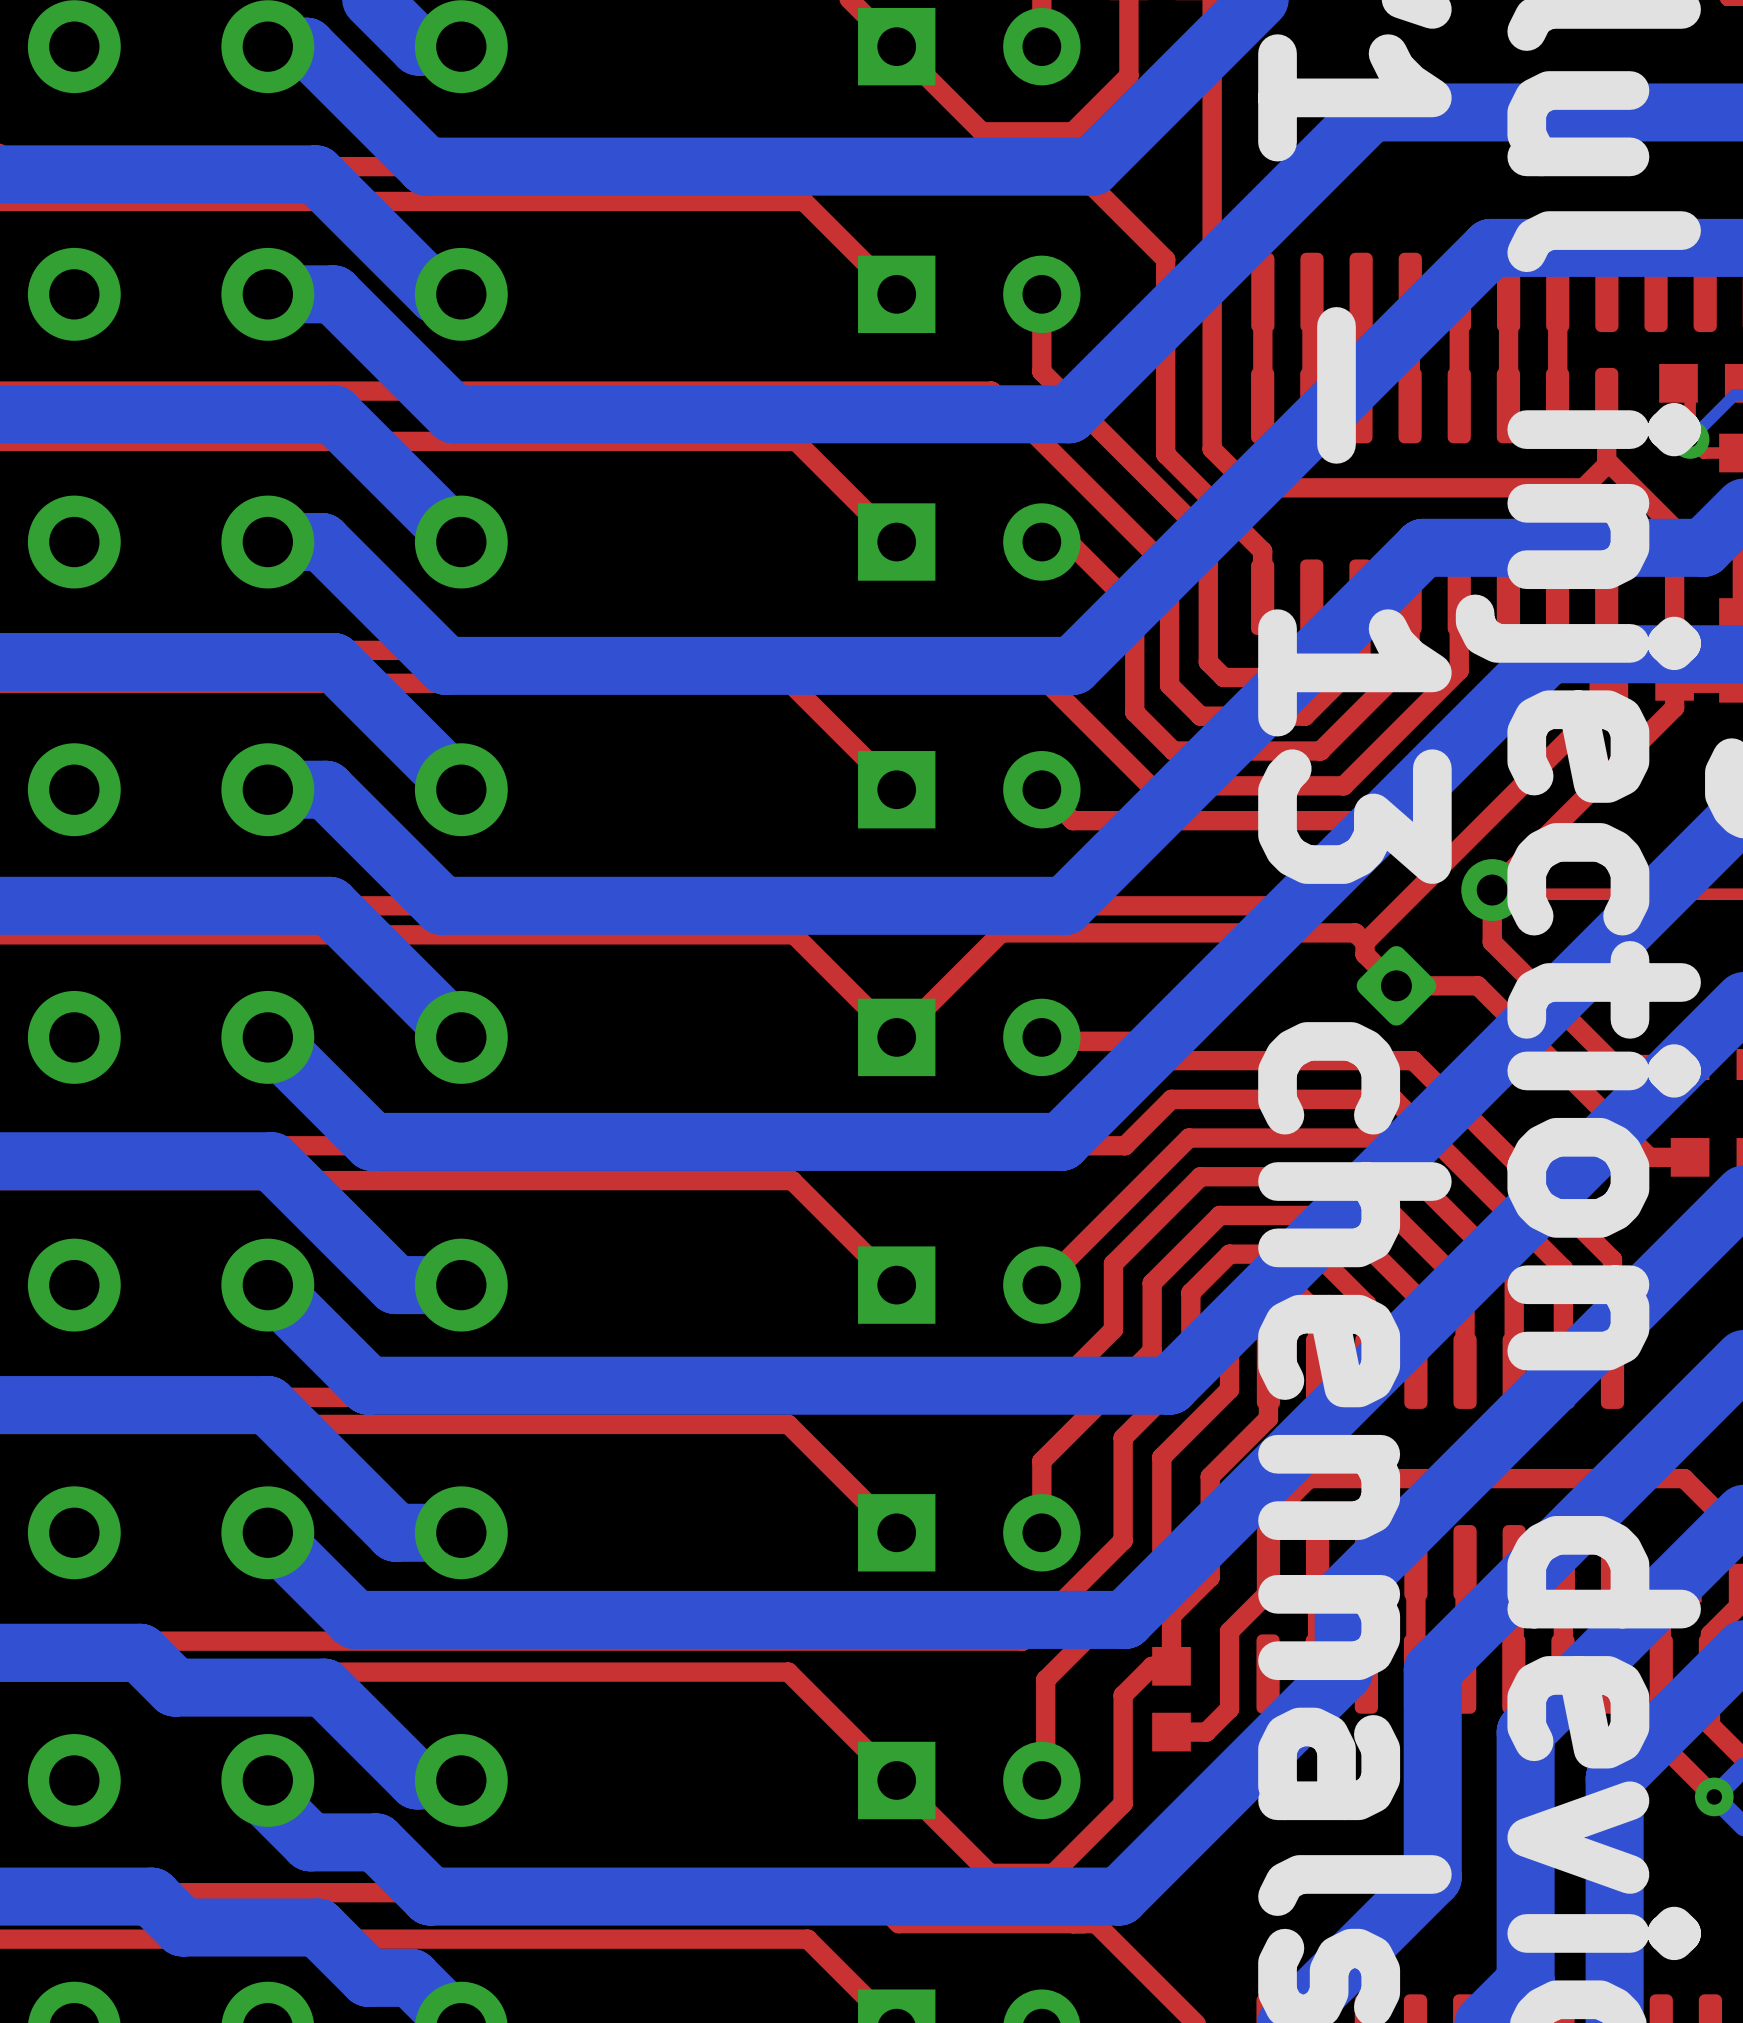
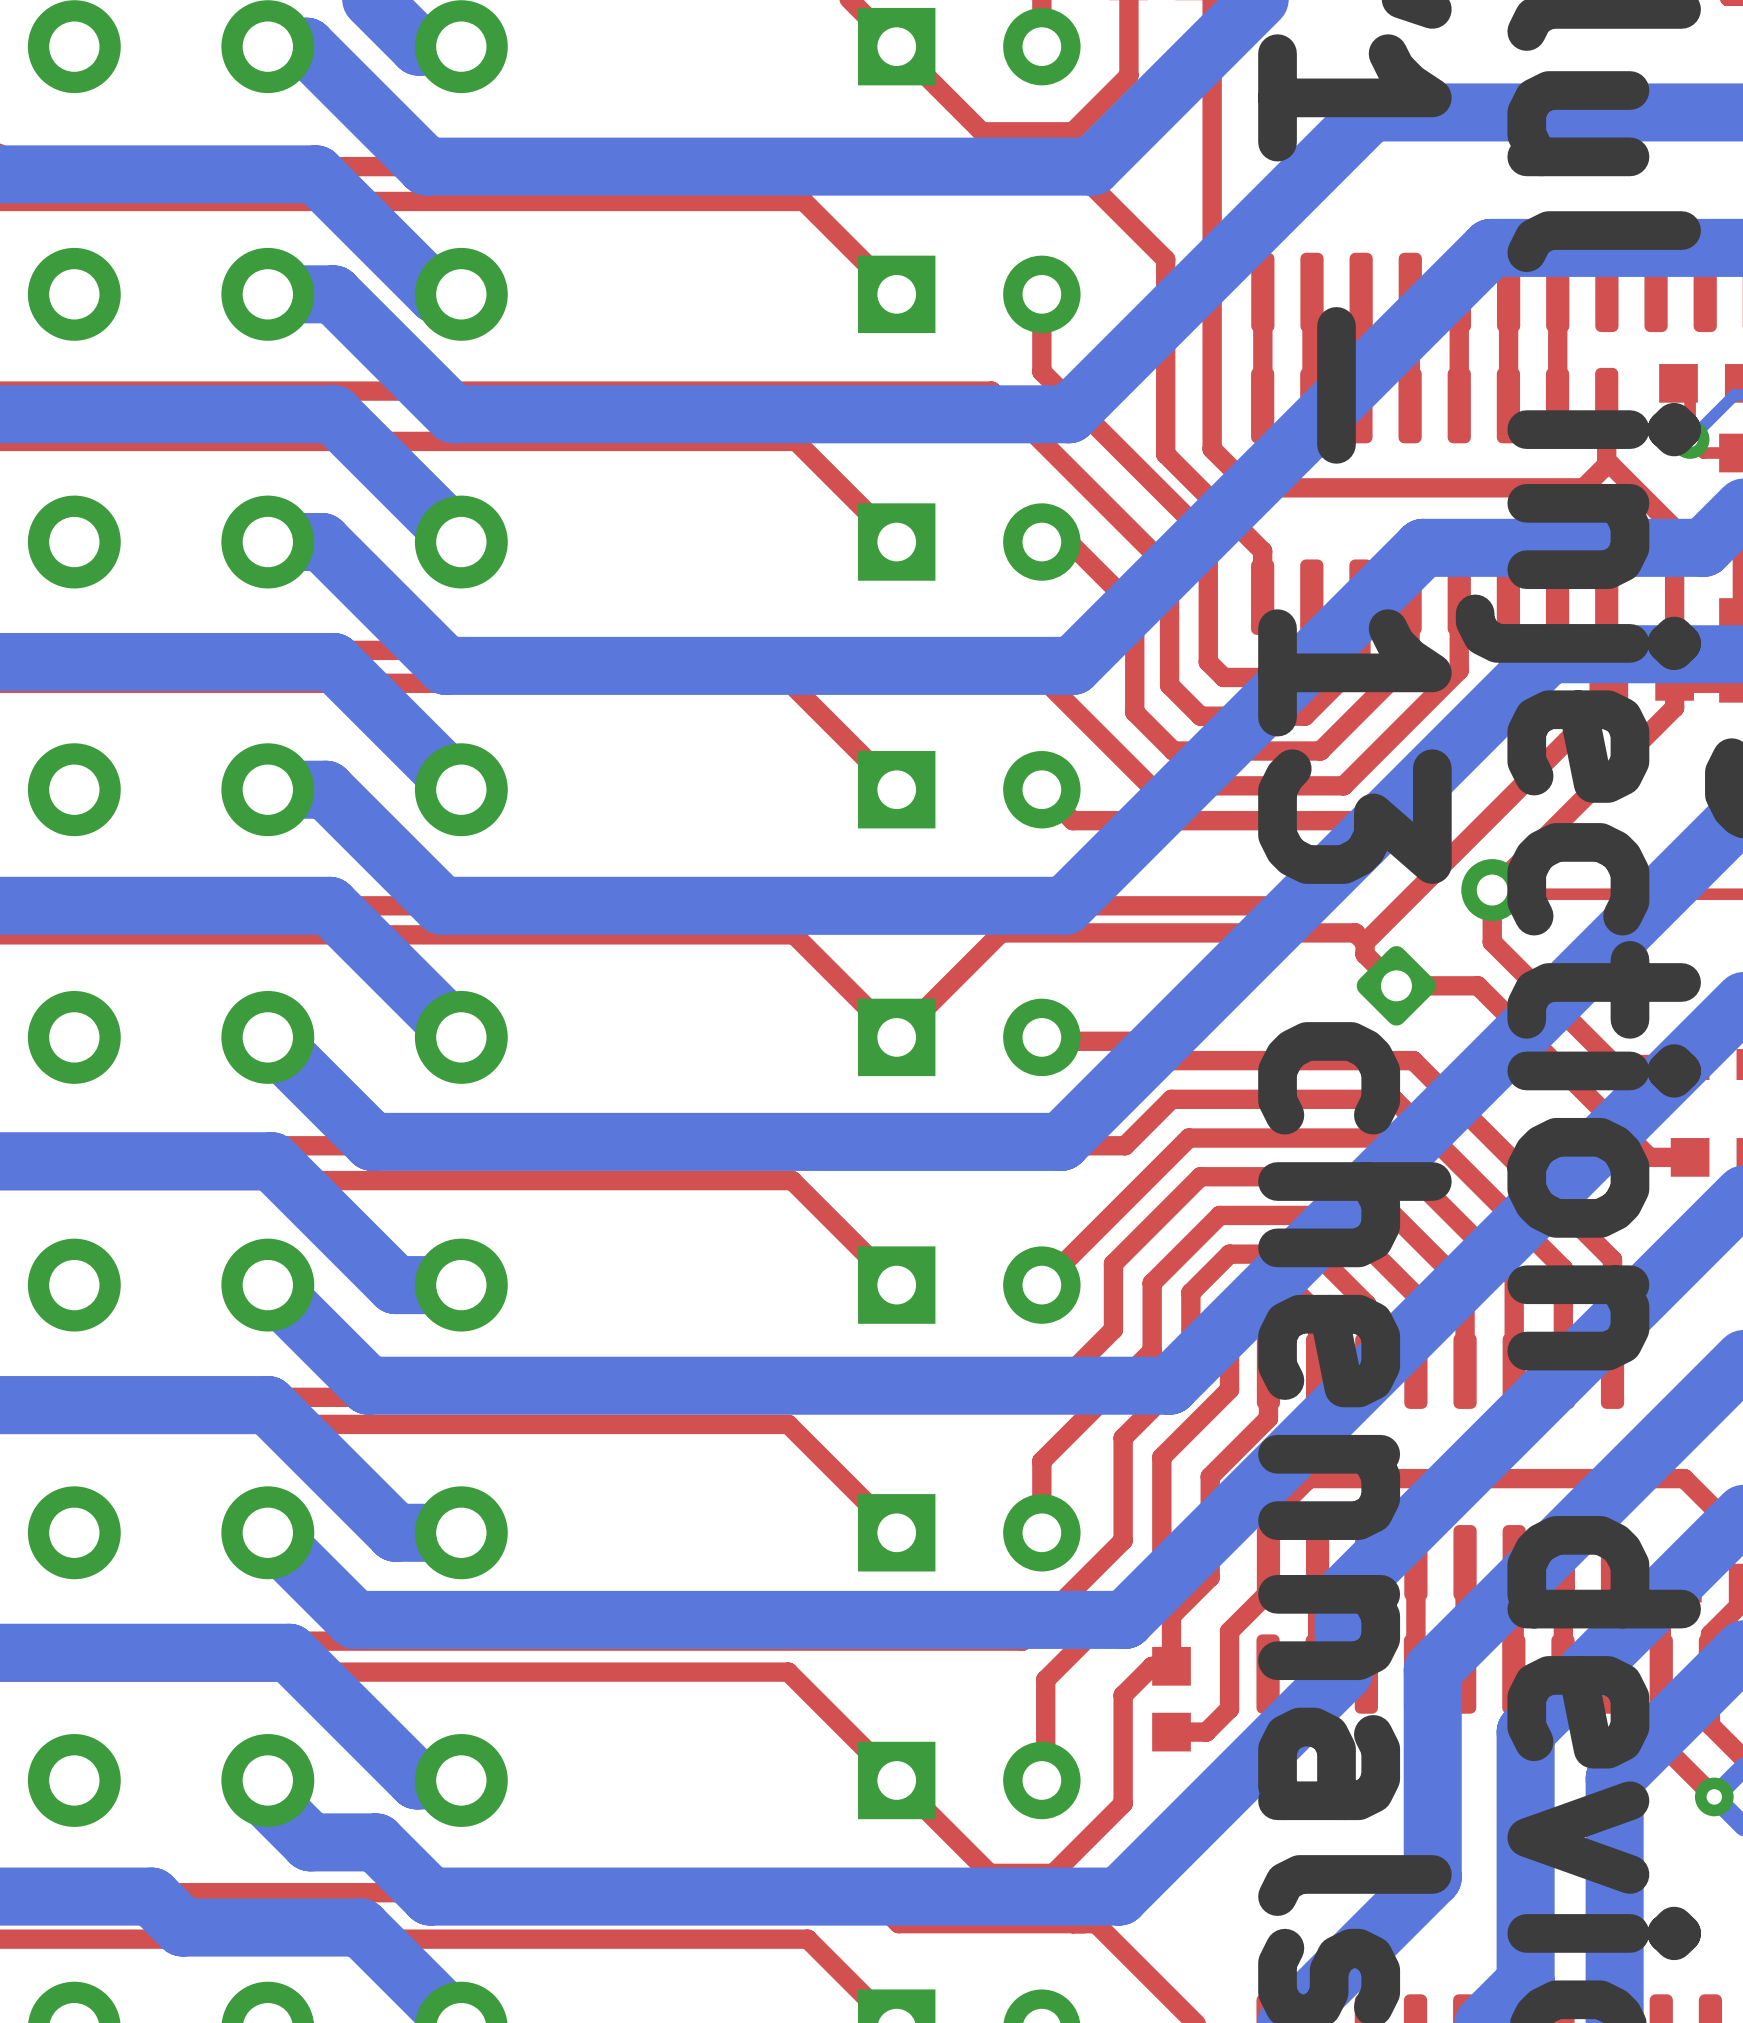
bottom track: (140, 1652) (174, 1687) (324, 1687) -> (140, 1652) (289, 1652) (324, 1687)
bottom track: (318, 1927) (368, 1977) (411, 1977) -> (318, 1927) (360, 1927) (411, 1977)

